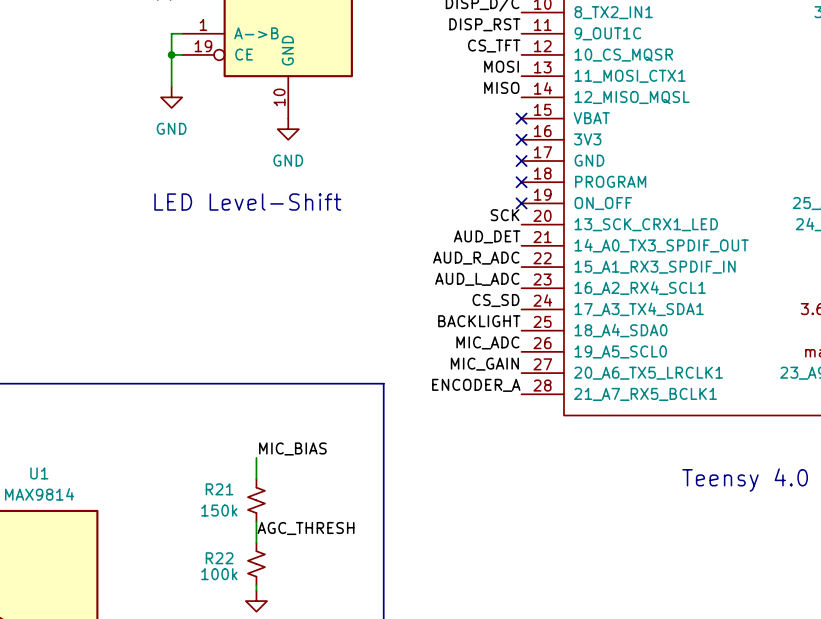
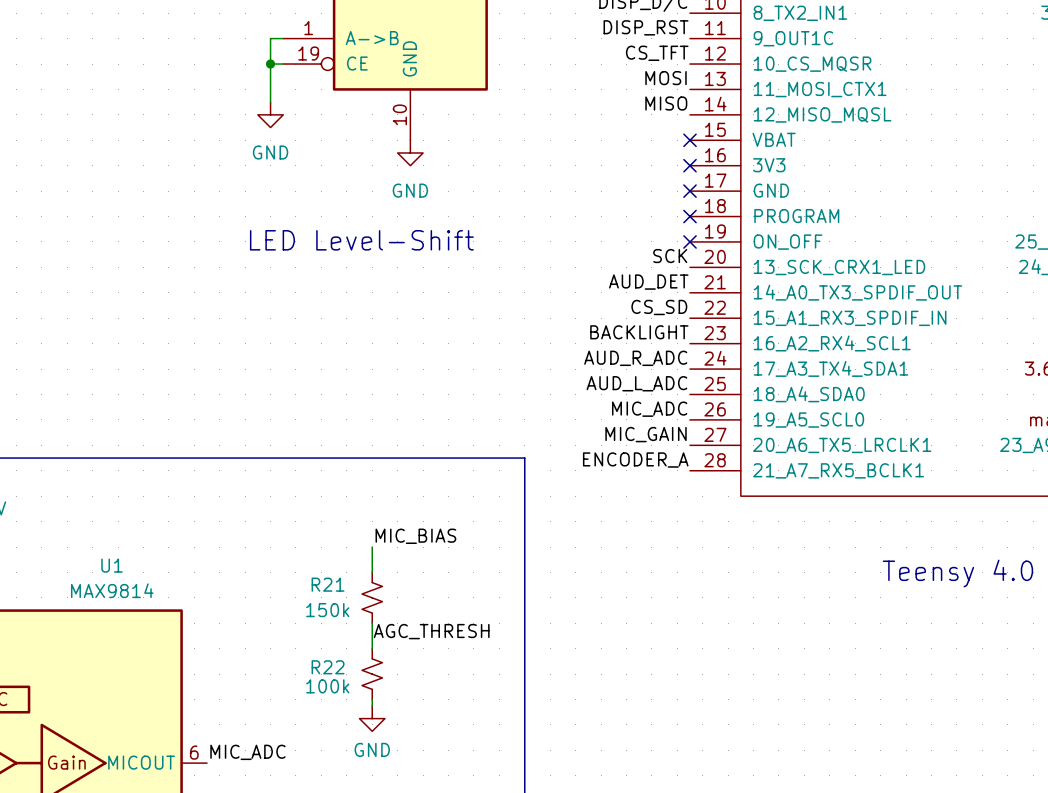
label: AUD_R_ADC (476, 258) -> CS_SD (659, 307)
label: AUD_L_ADC (477, 279) -> BACKLIGHT (639, 332)
label: CS_SD (495, 300) -> AUD_R_ADC (635, 358)
label: BACKLIGHT (479, 321) -> AUD_L_ADC (636, 383)

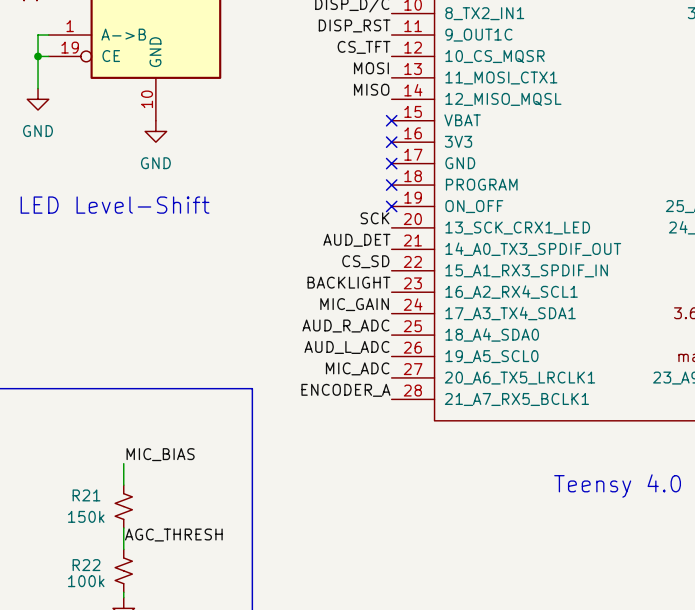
label: AUD_R_ADC (635, 358) -> MIC_GAIN (354, 304)
label: AUD_L_ADC (636, 383) -> AUD_R_ADC (345, 326)
label: MIC_ADC (649, 409) -> AUD_L_ADC (346, 347)
label: MIC_GAIN (646, 434) -> MIC_ADC (357, 368)

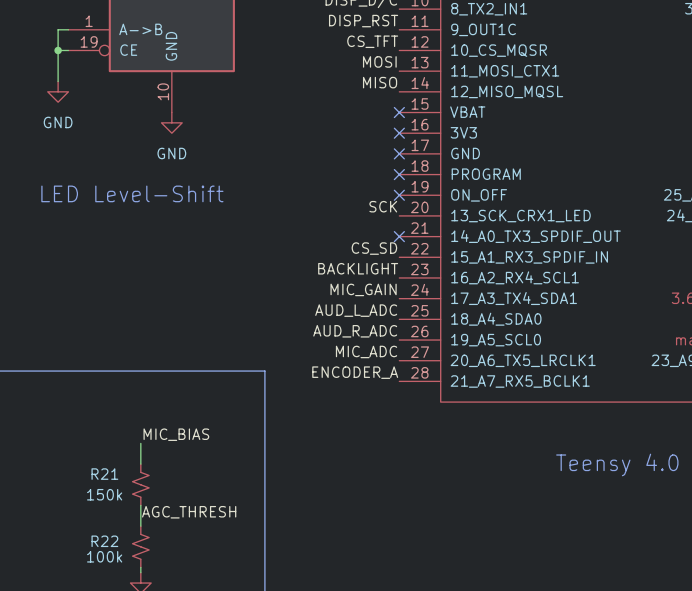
label: AUD_DET (356, 240) -> none
no-connect mark: none -> (399, 236)
label: AUD_R_ADC (345, 326) -> AUD_L_ADC (356, 310)
label: AUD_L_ADC (346, 347) -> AUD_R_ADC (355, 331)

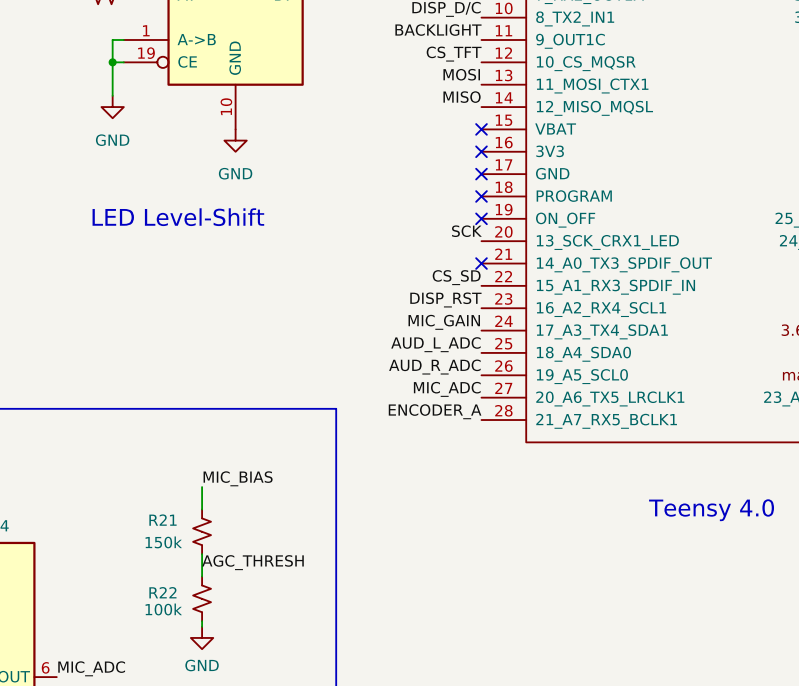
label: DISP_RST (363, 21) -> BACKLIGHT (438, 30)
label: BACKLIGHT (358, 268) -> DISP_RST (445, 299)

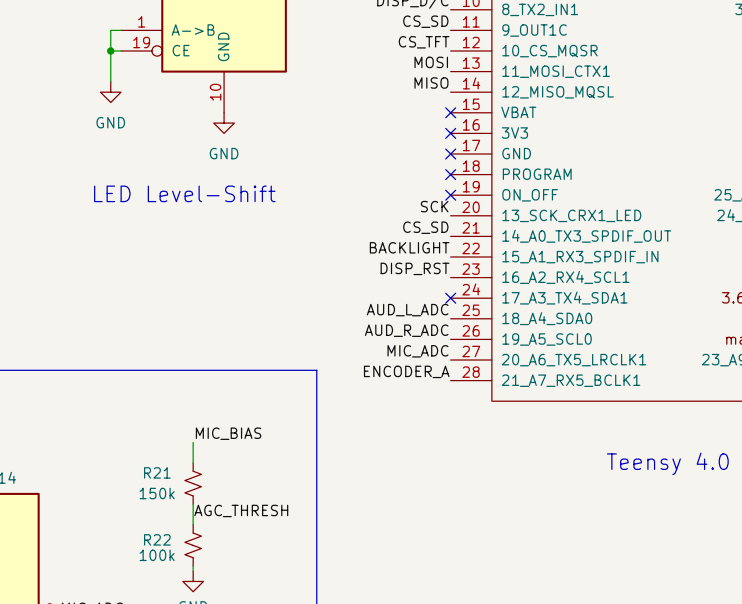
label: BACKLIGHT (438, 30) -> CS_SD (425, 21)
label: none -> CS_SD (425, 227)
no-connect mark: (481, 263) -> none
label: CS_SD (456, 277) -> BACKLIGHT (409, 247)
label: MIC_GAIN (444, 322) -> none
no-connect mark: none -> (450, 298)

